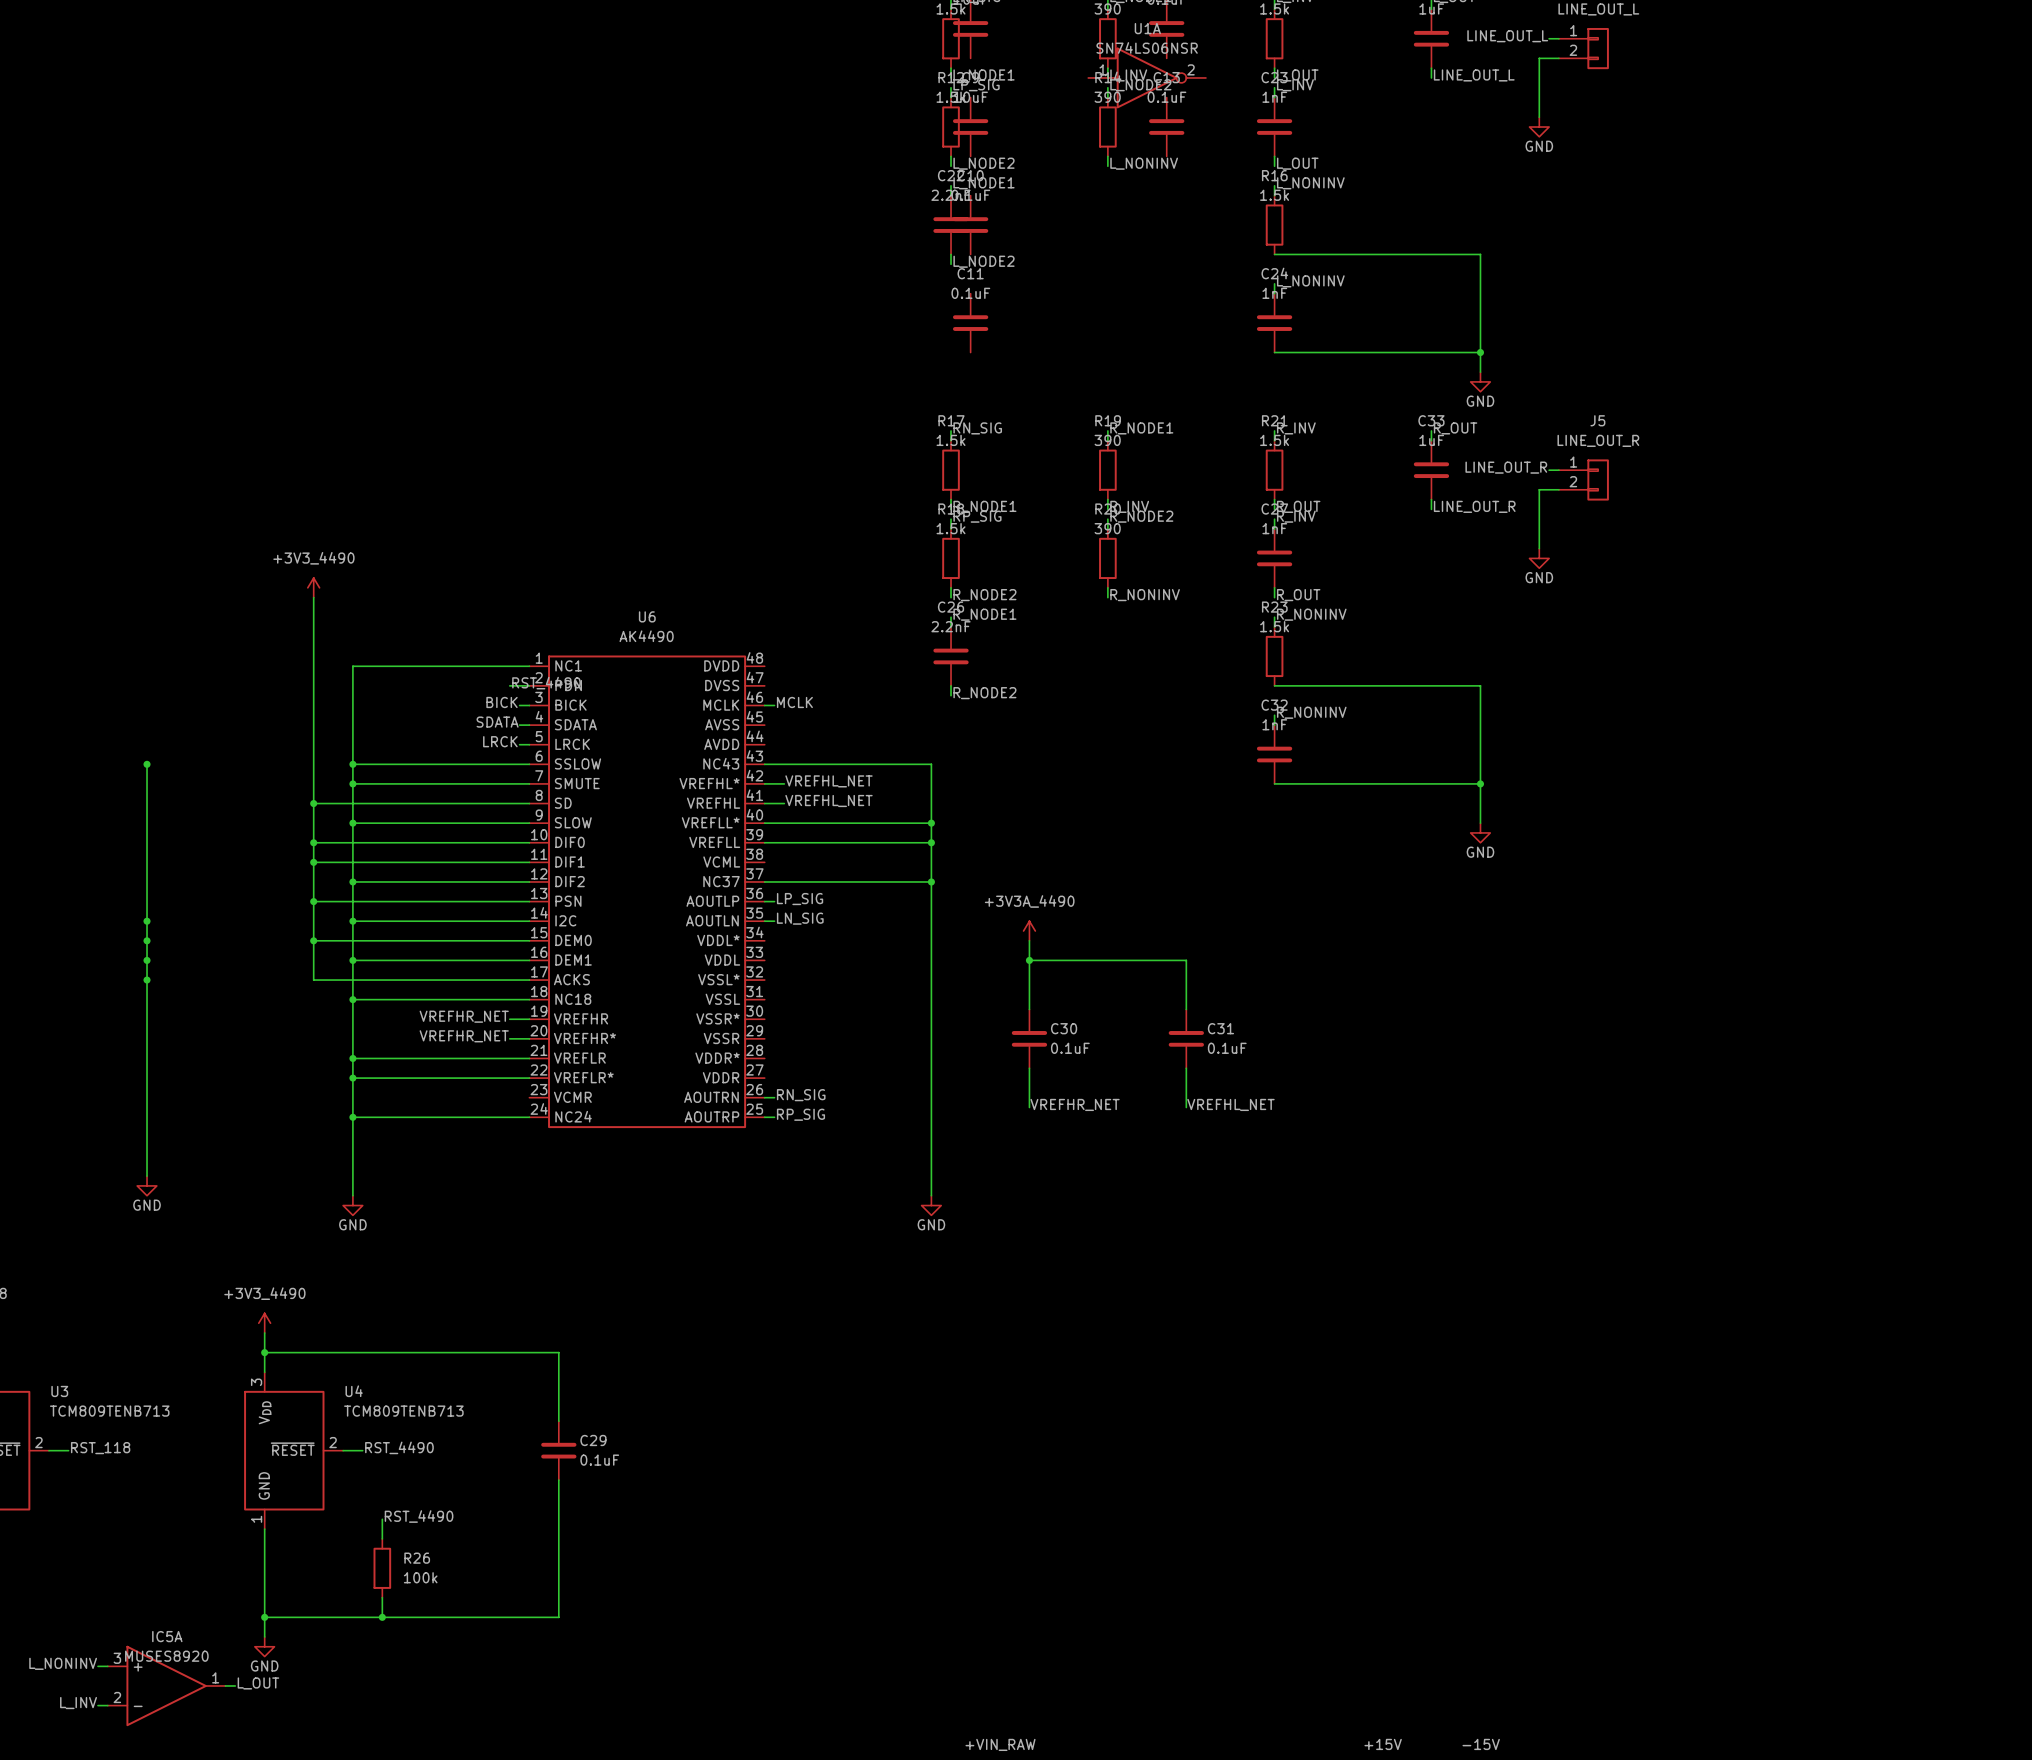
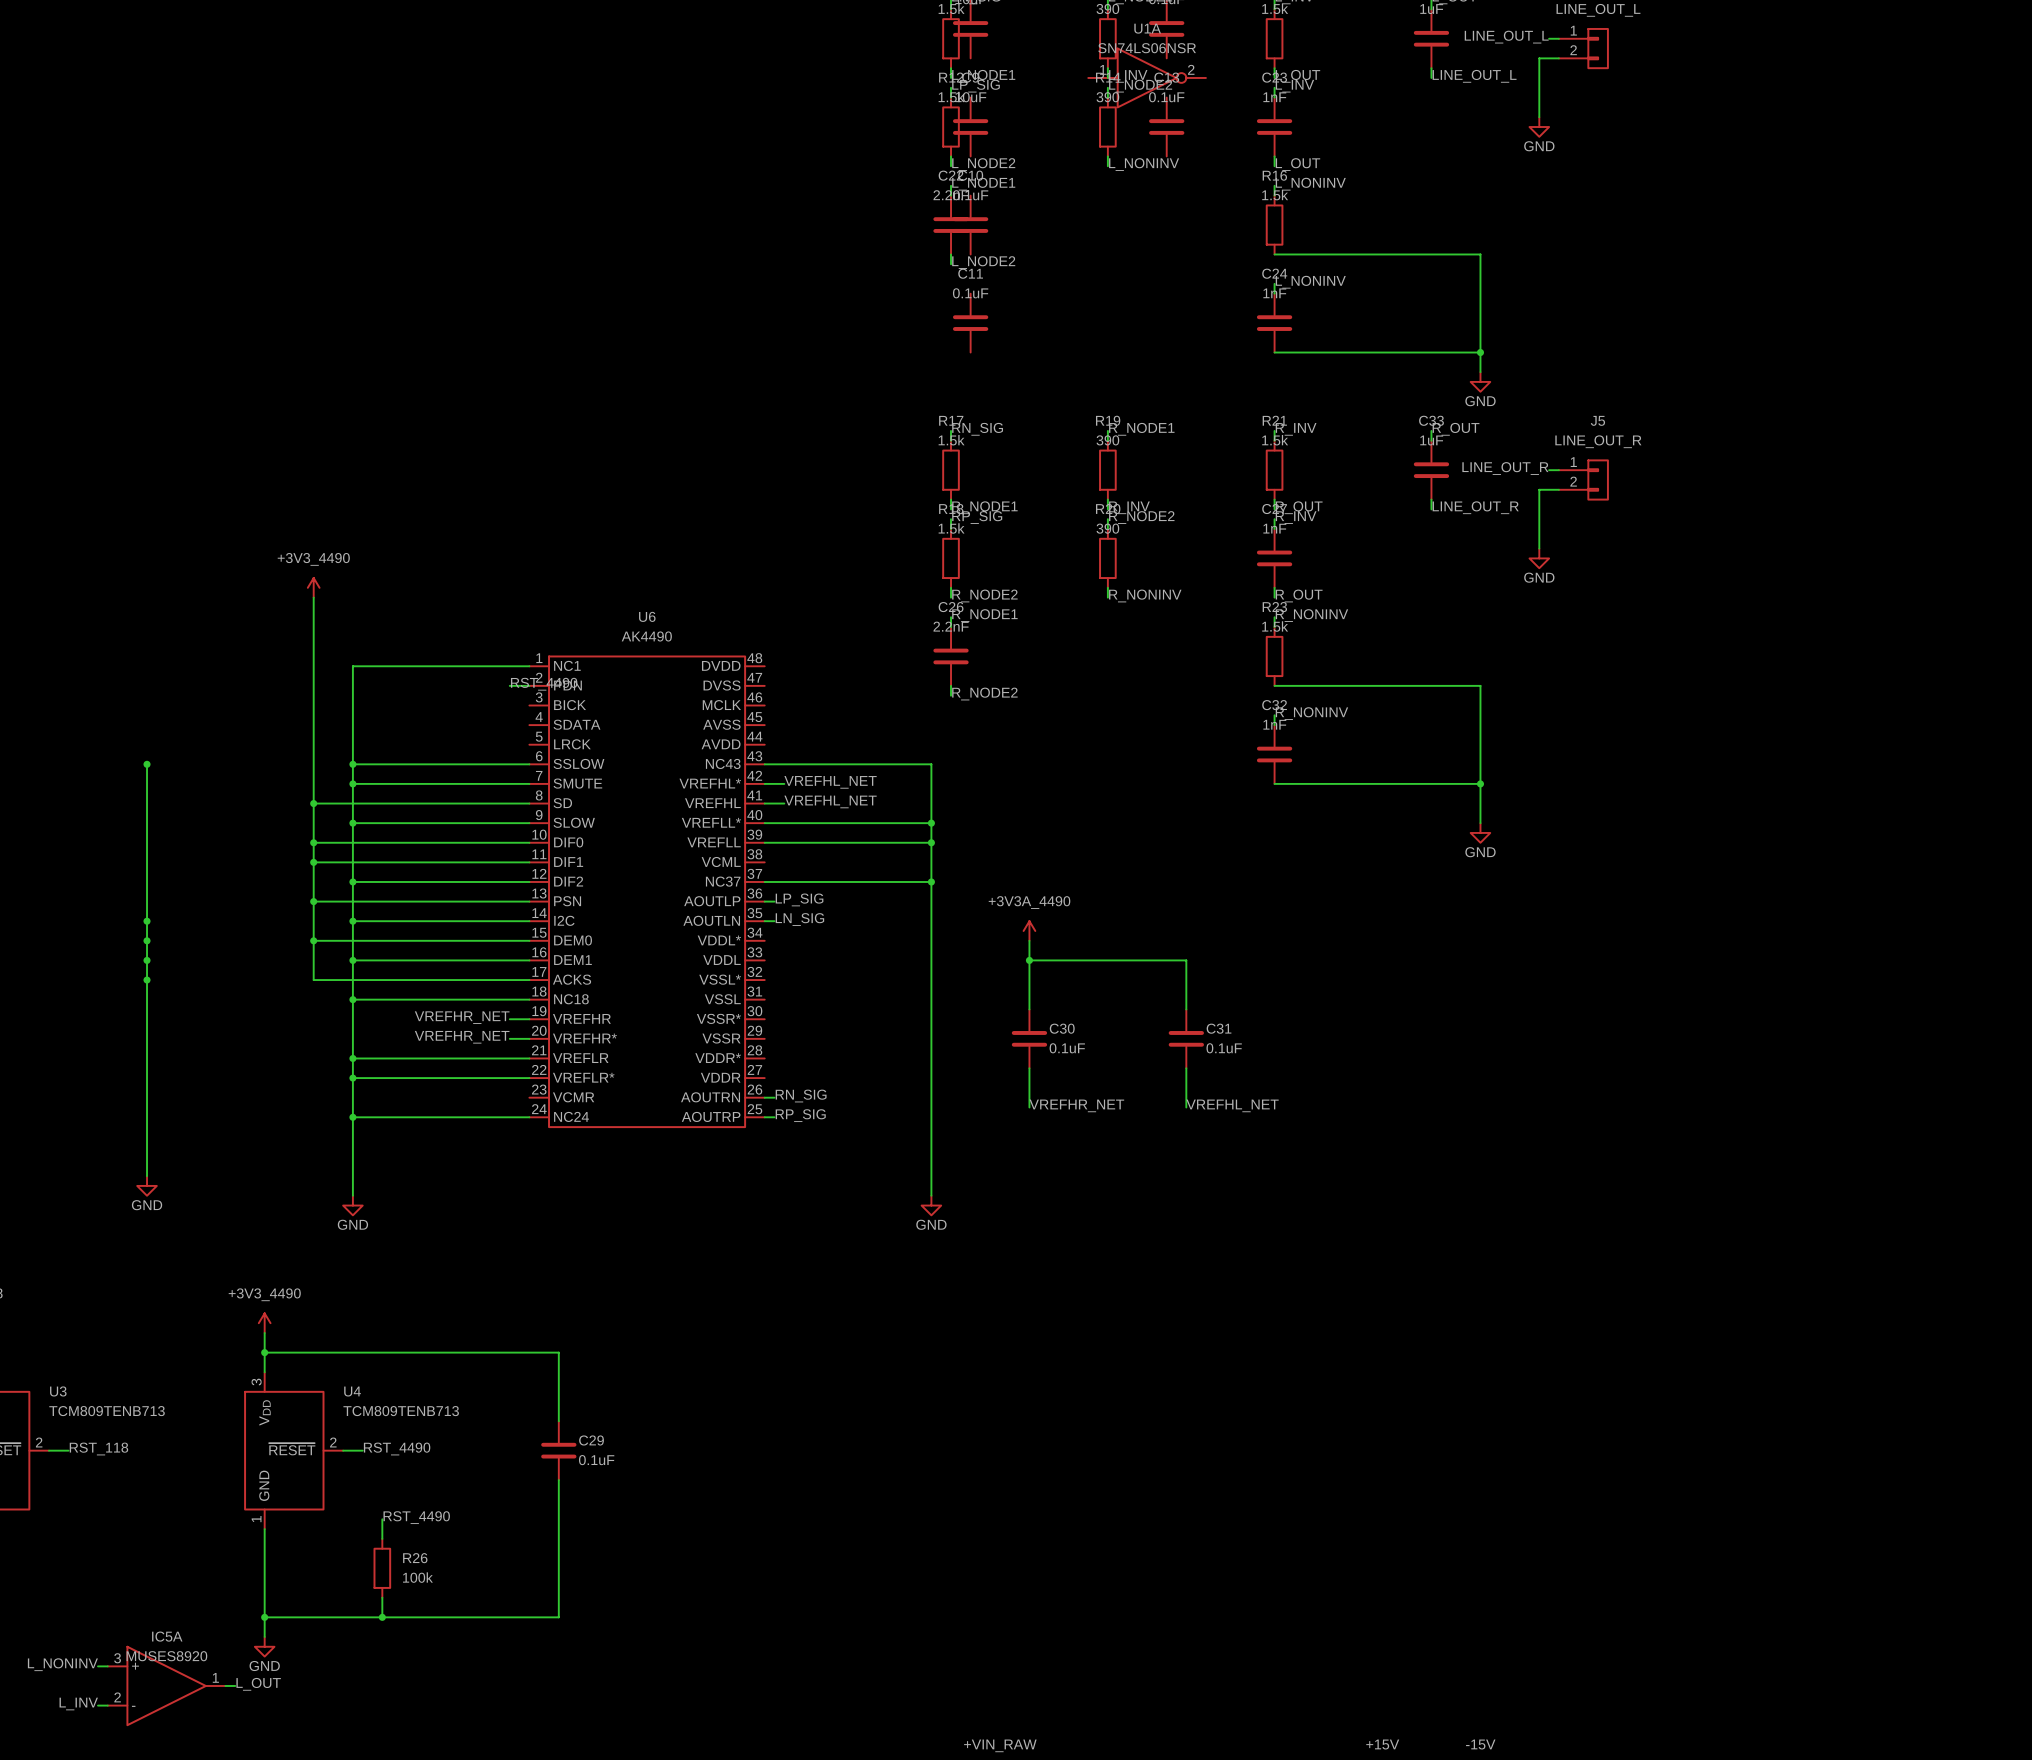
label: BICK (502, 702) -> none
label: MCLK (794, 702) -> none
wire: (519, 705) (529, 705) -> none
wire: (764, 705) (774, 705) -> none
label: SDATA (497, 722) -> none
wire: (519, 725) (529, 725) -> none
label: LRCK (500, 741) -> none
wire: (519, 744) (529, 744) -> none

